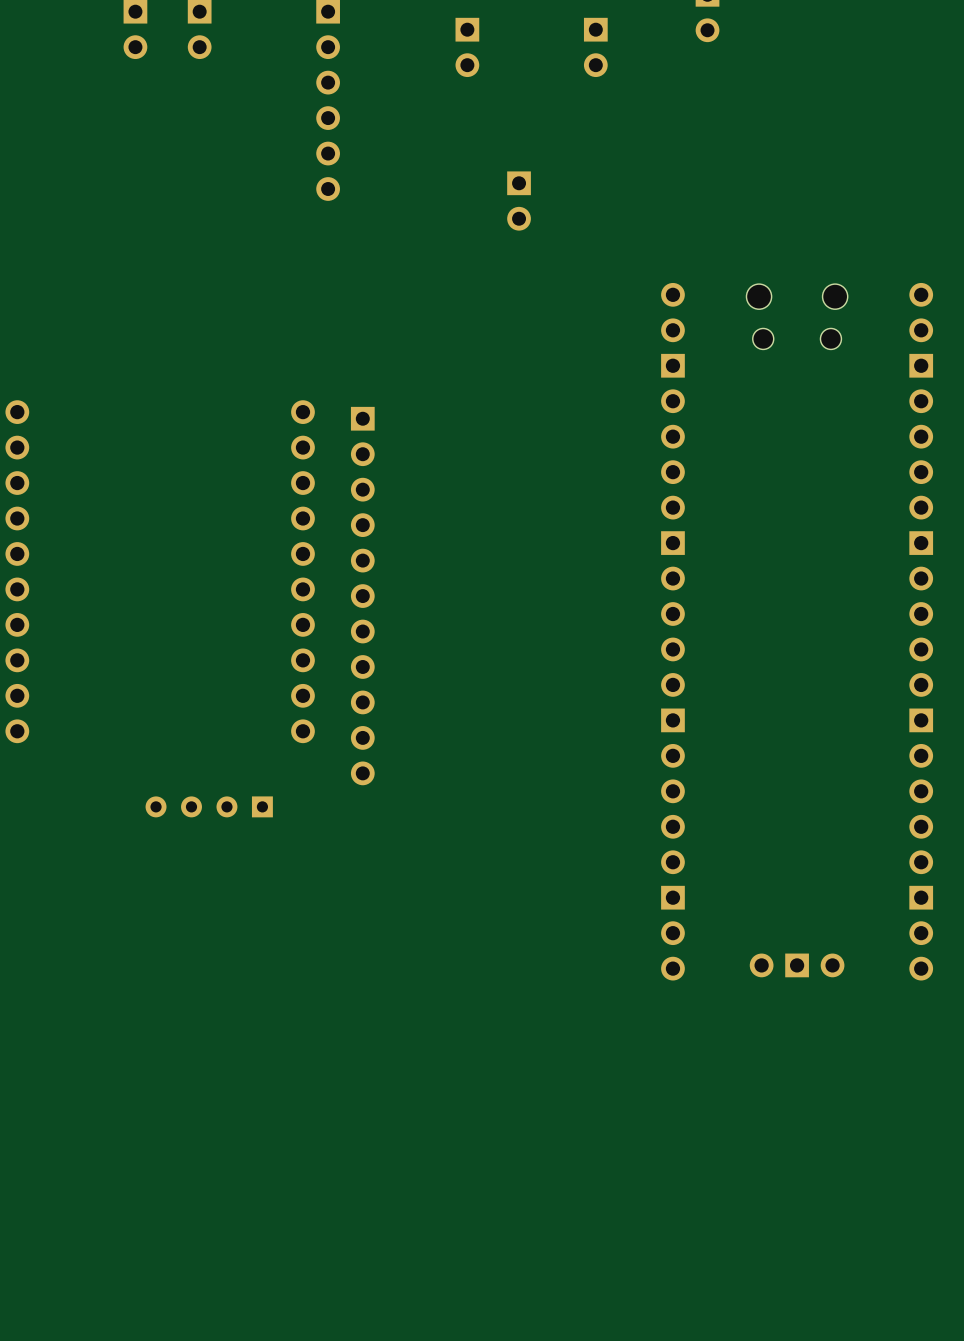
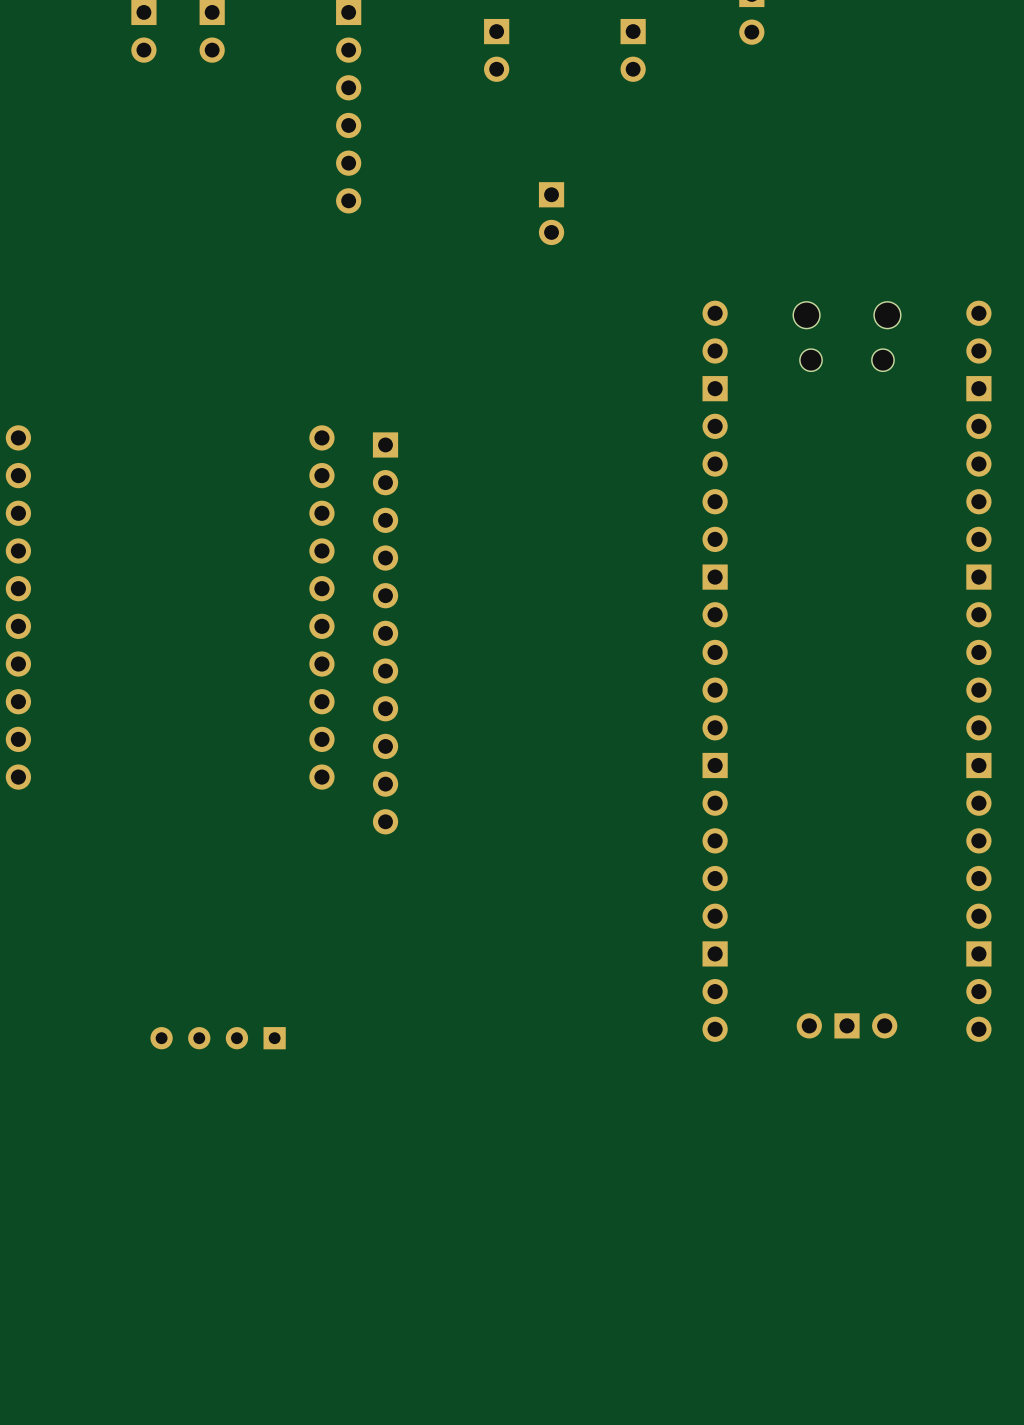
part position: (209, 806) -> (218, 1038)

